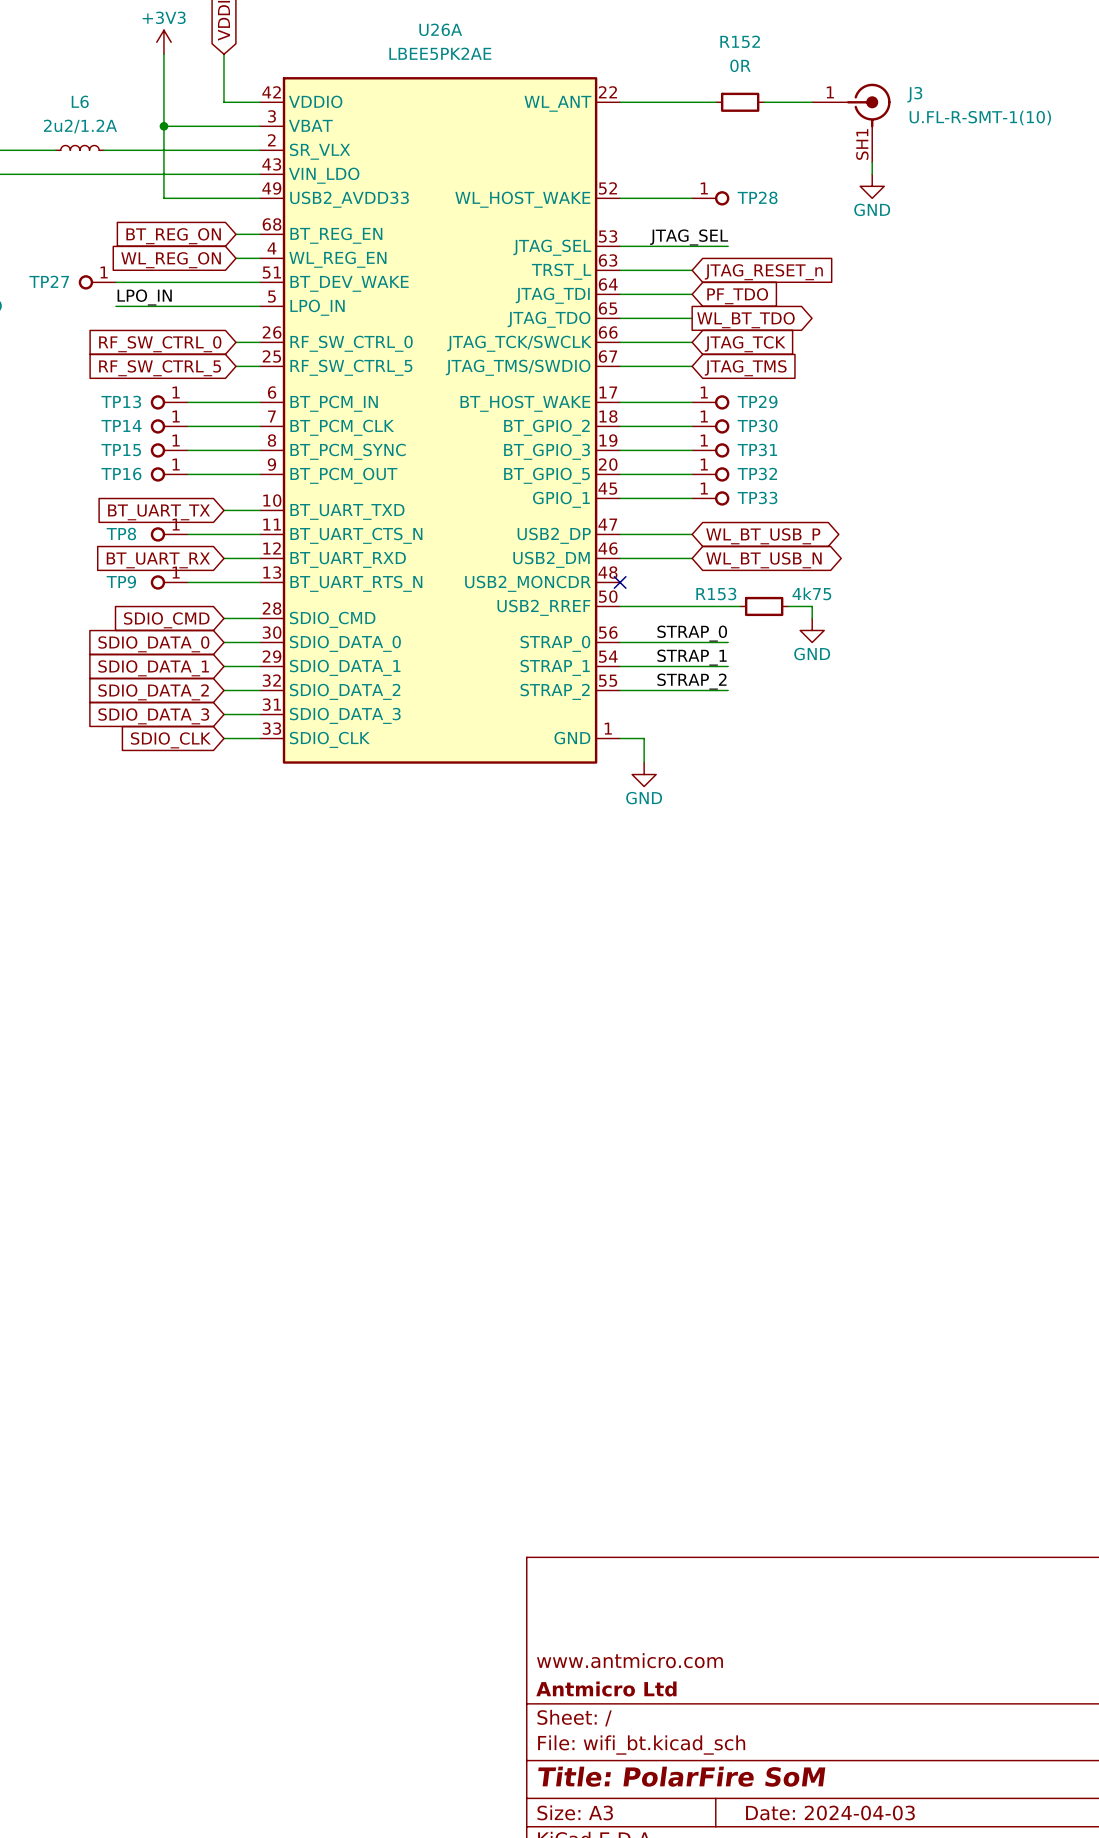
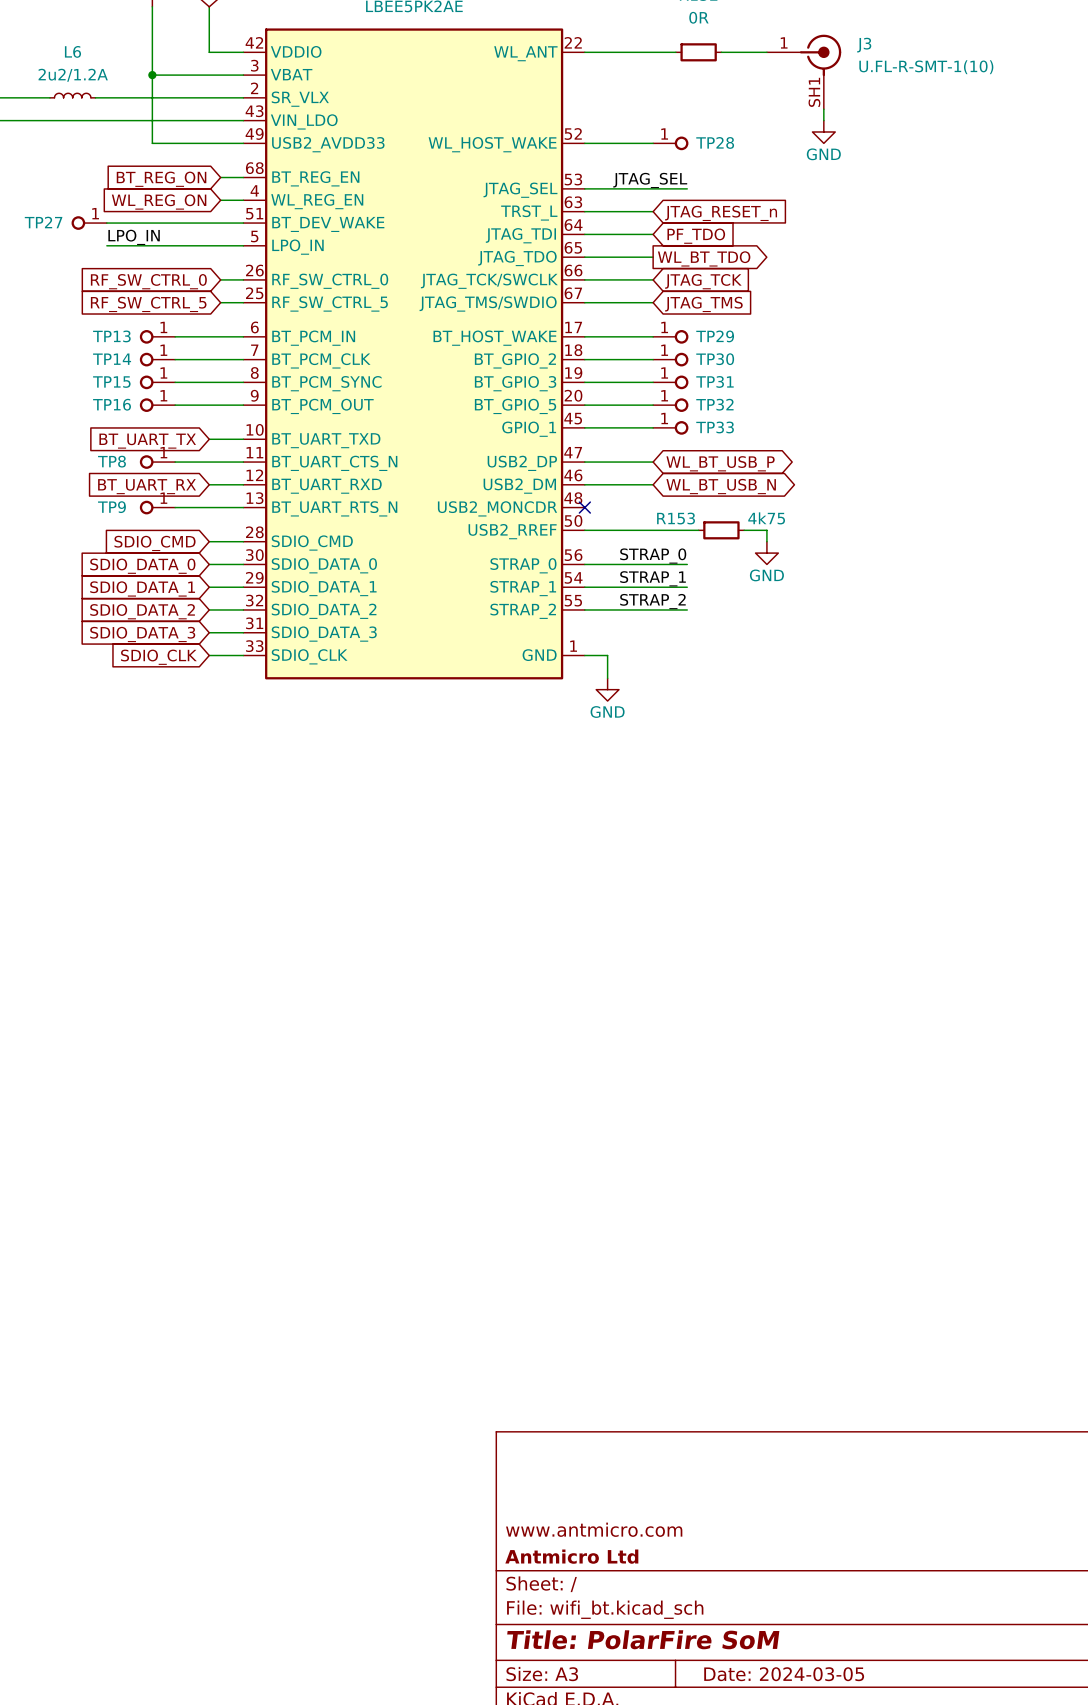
title block: Date: 2024-04-03 (830, 1812) -> Date: 2024-03-05 (784, 1674)

